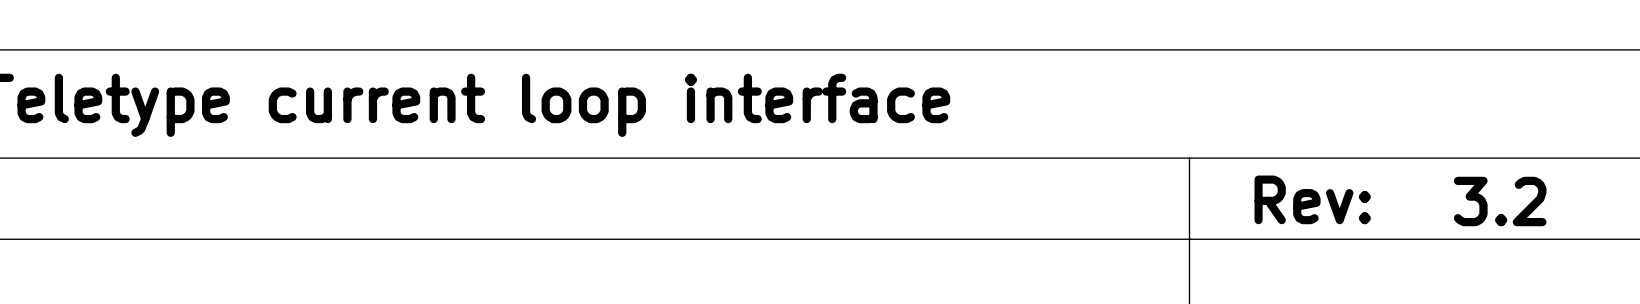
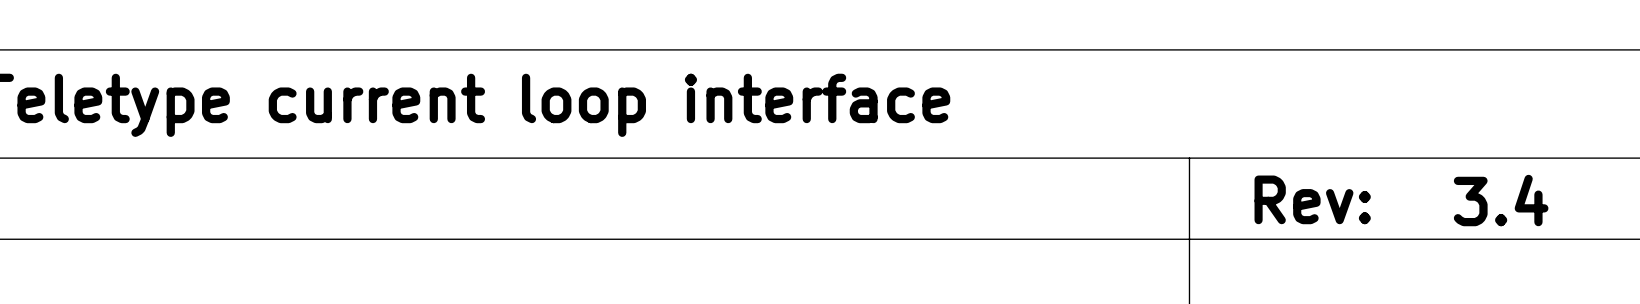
text: 3.2 (1500, 201) -> 3.4 (1501, 200)

